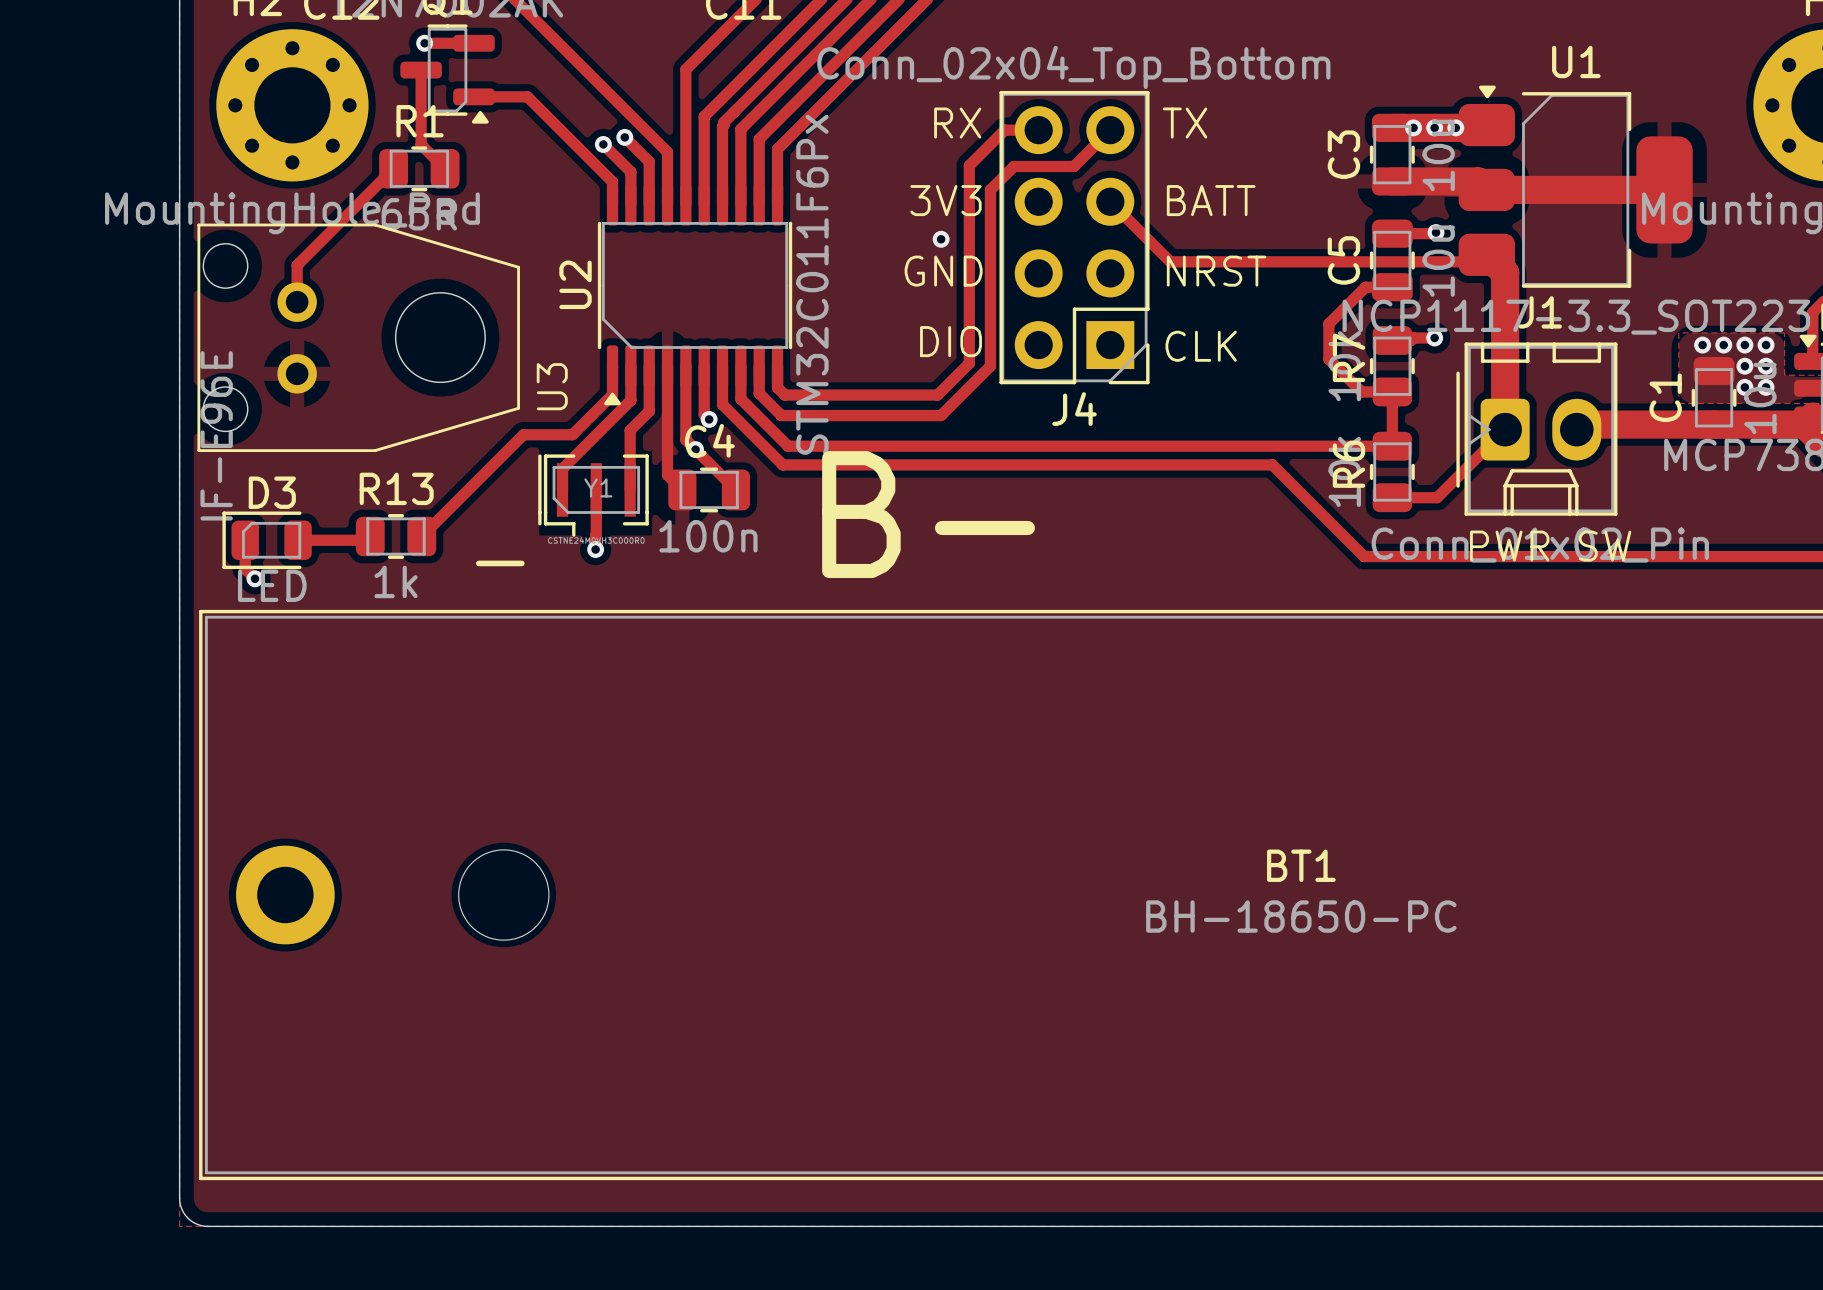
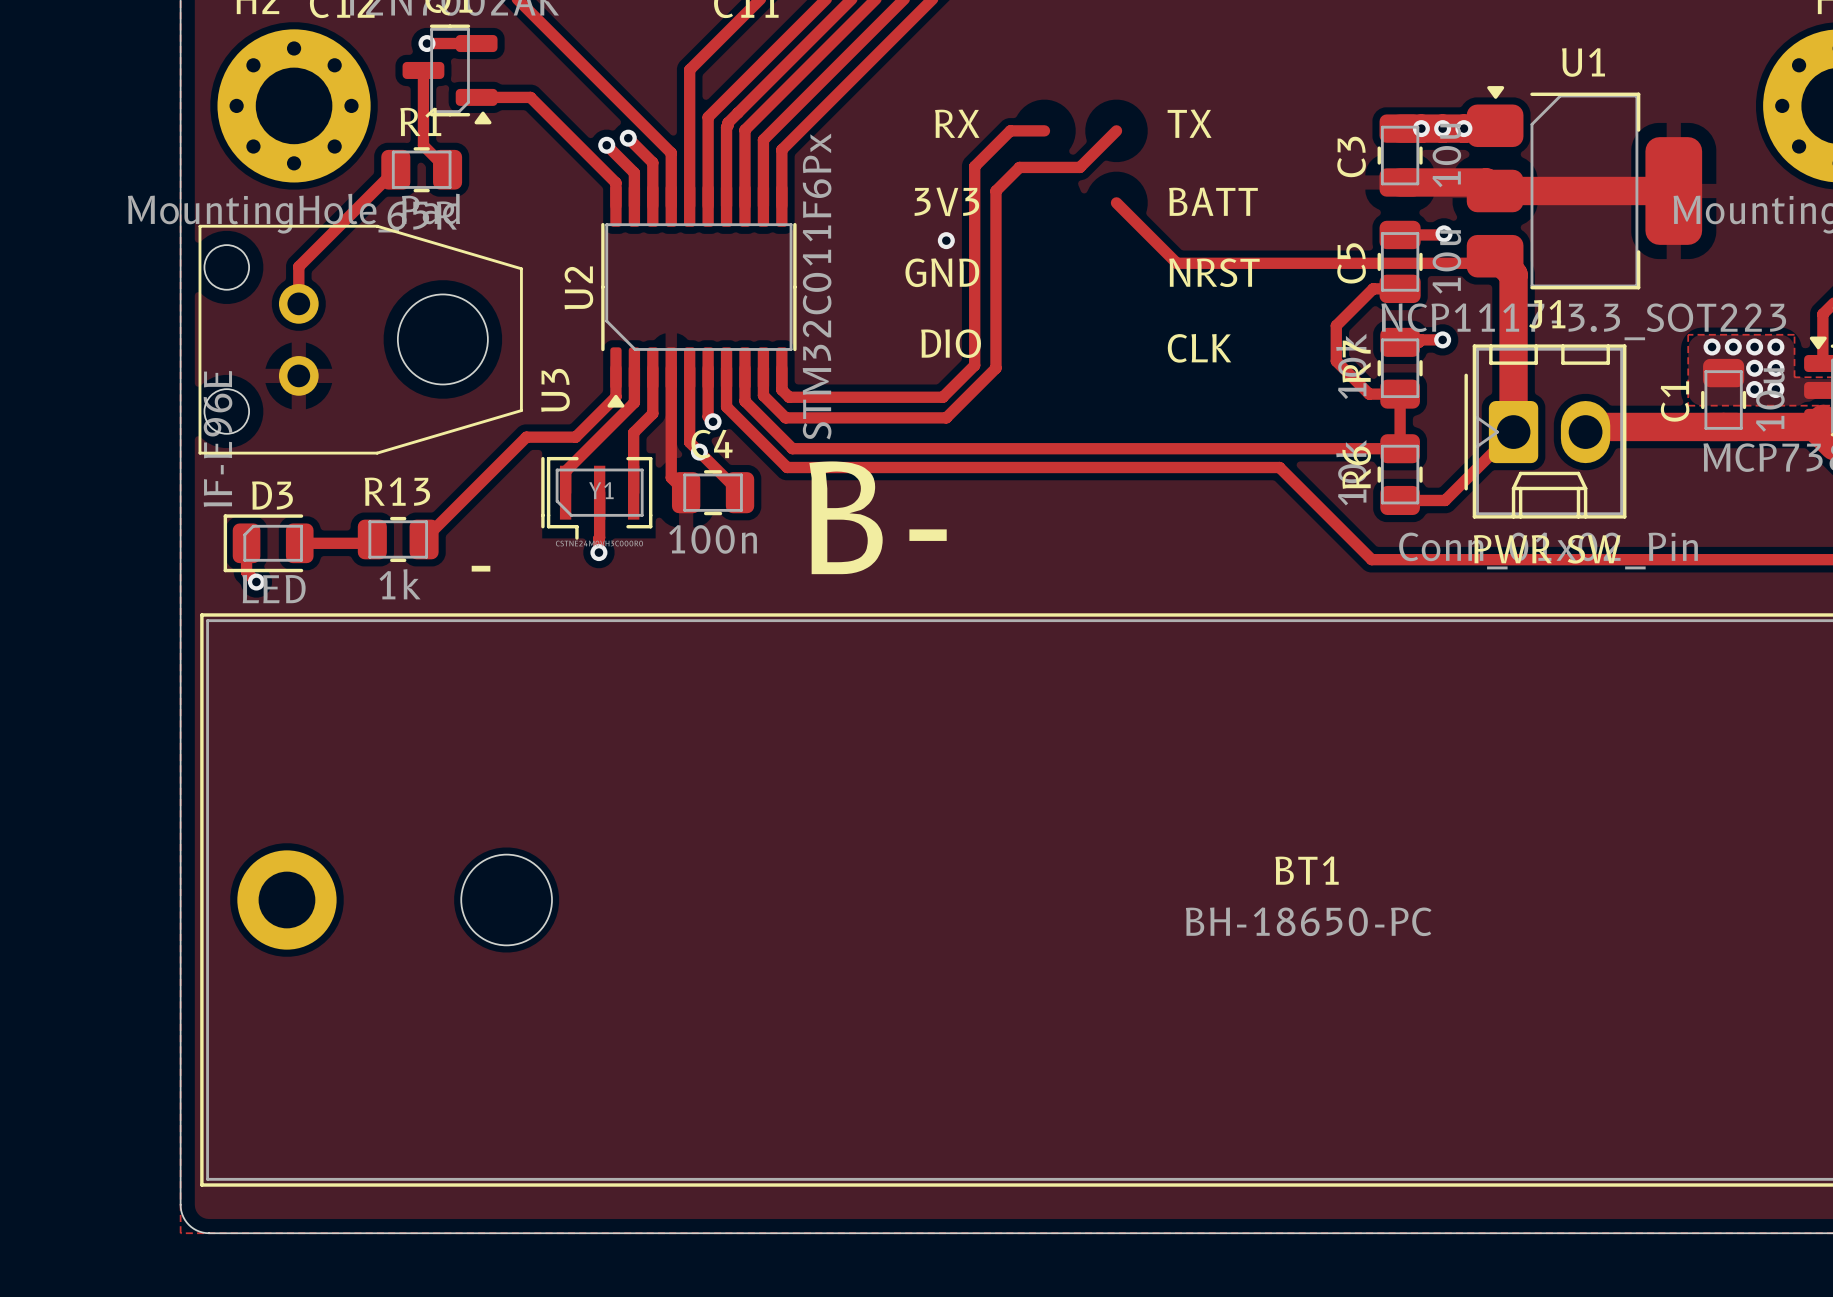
J4: Conn_02x04_Top_Bottom (1074, 237) -> none

